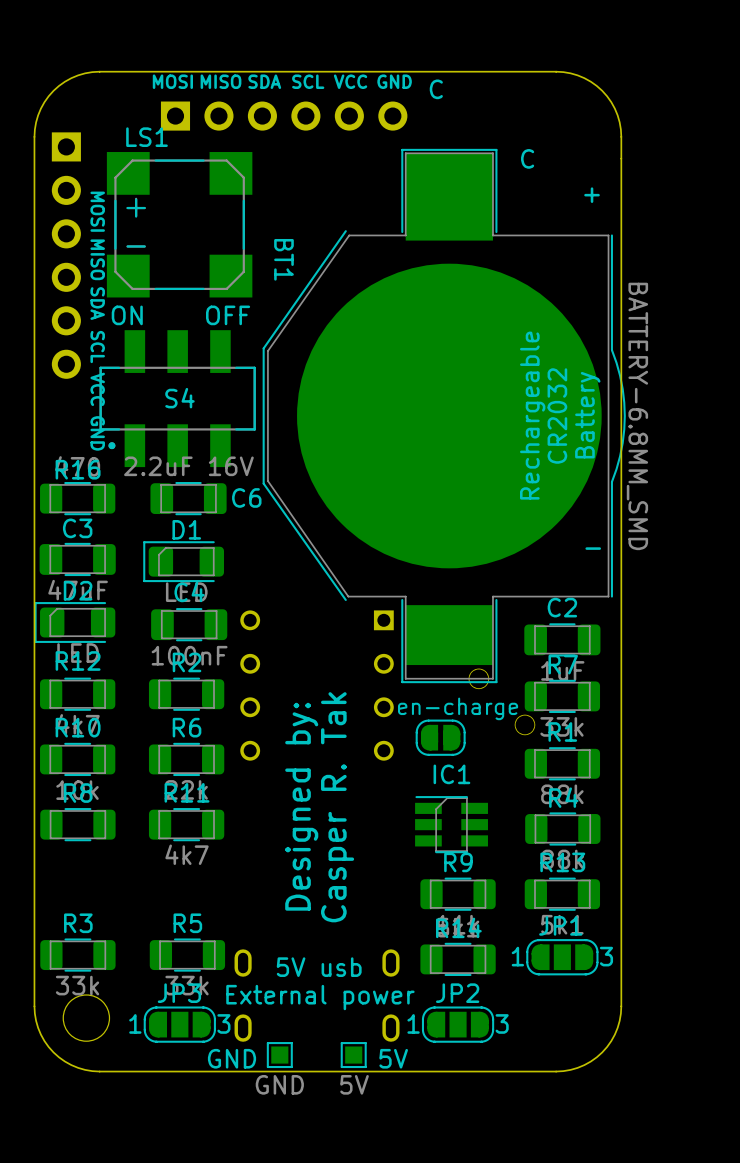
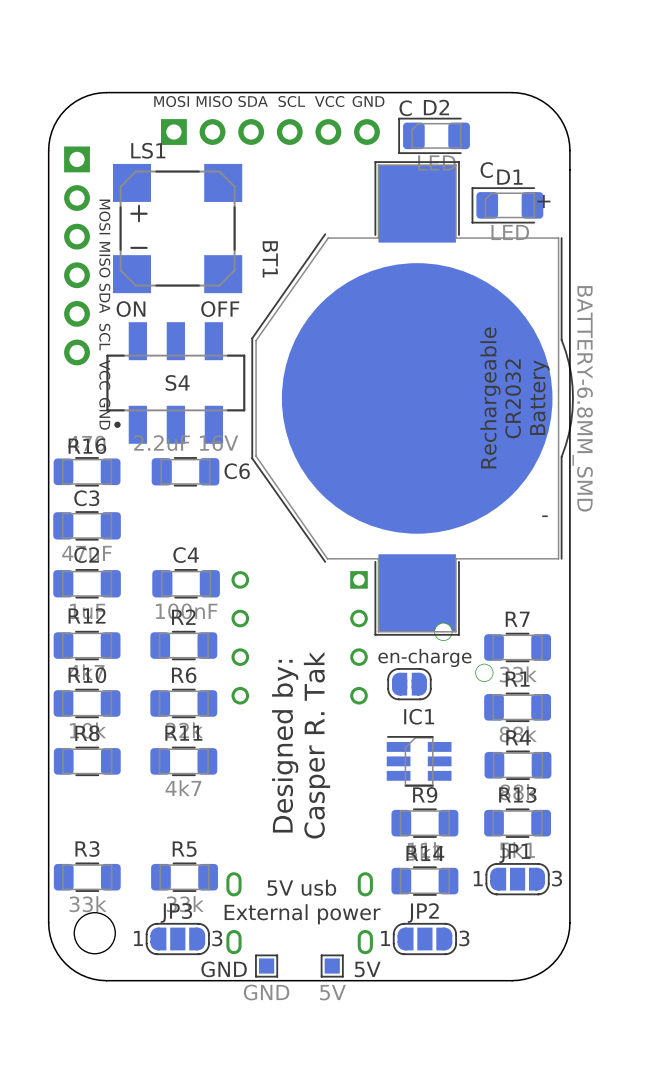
BT1 footprint: [262, 148, 626, 684] -> [251, 161, 574, 636]
D1 position: (183, 561) -> (507, 205)
D2 position: (74, 622) -> (434, 135)
C2 position: (562, 639) -> (87, 583)

